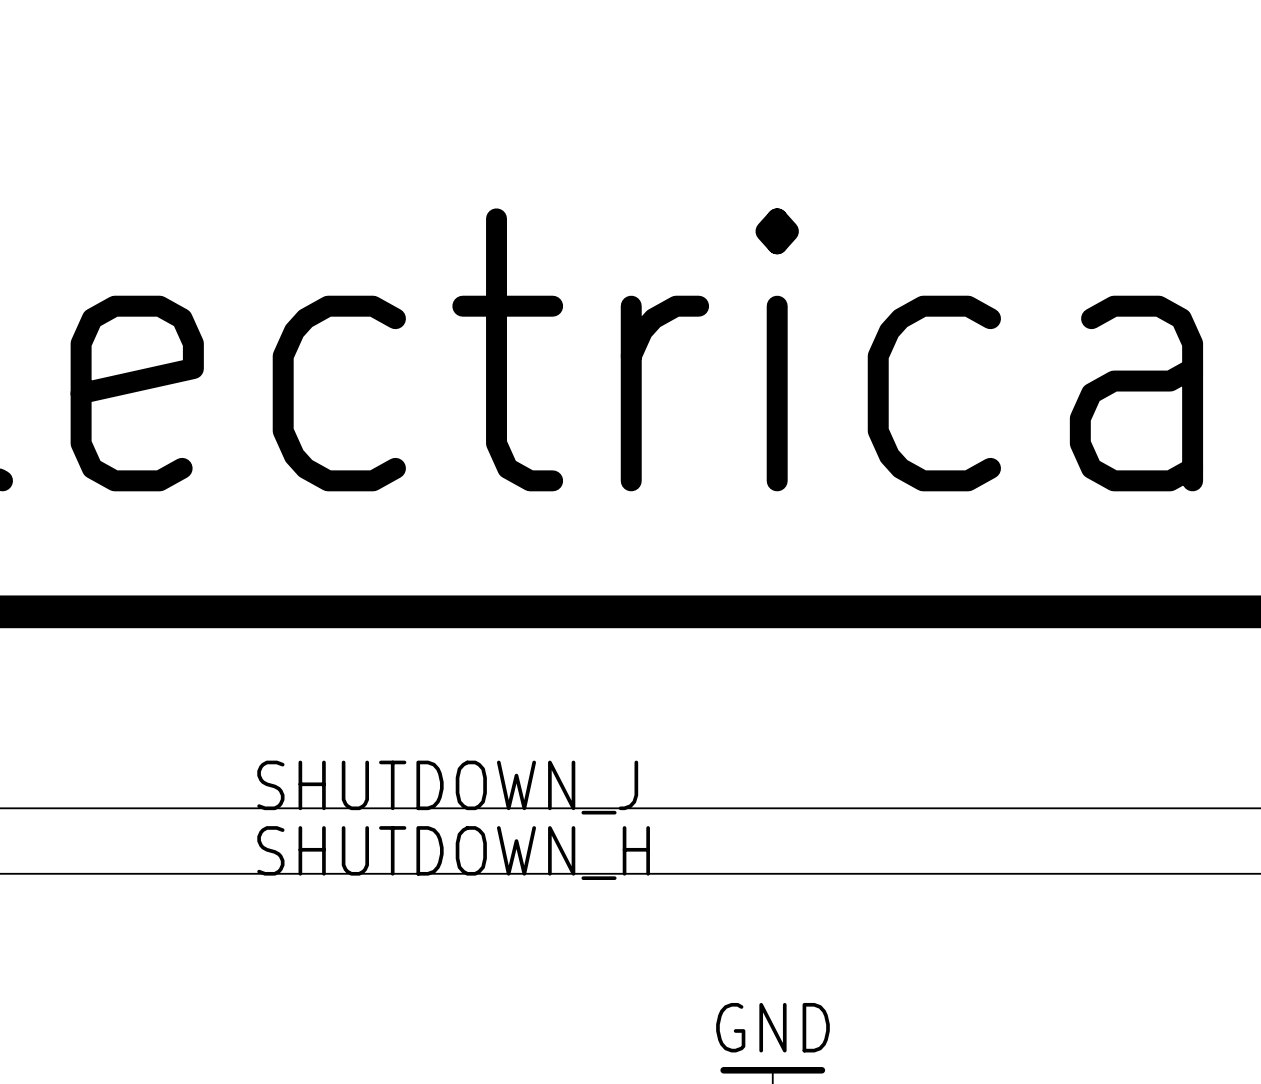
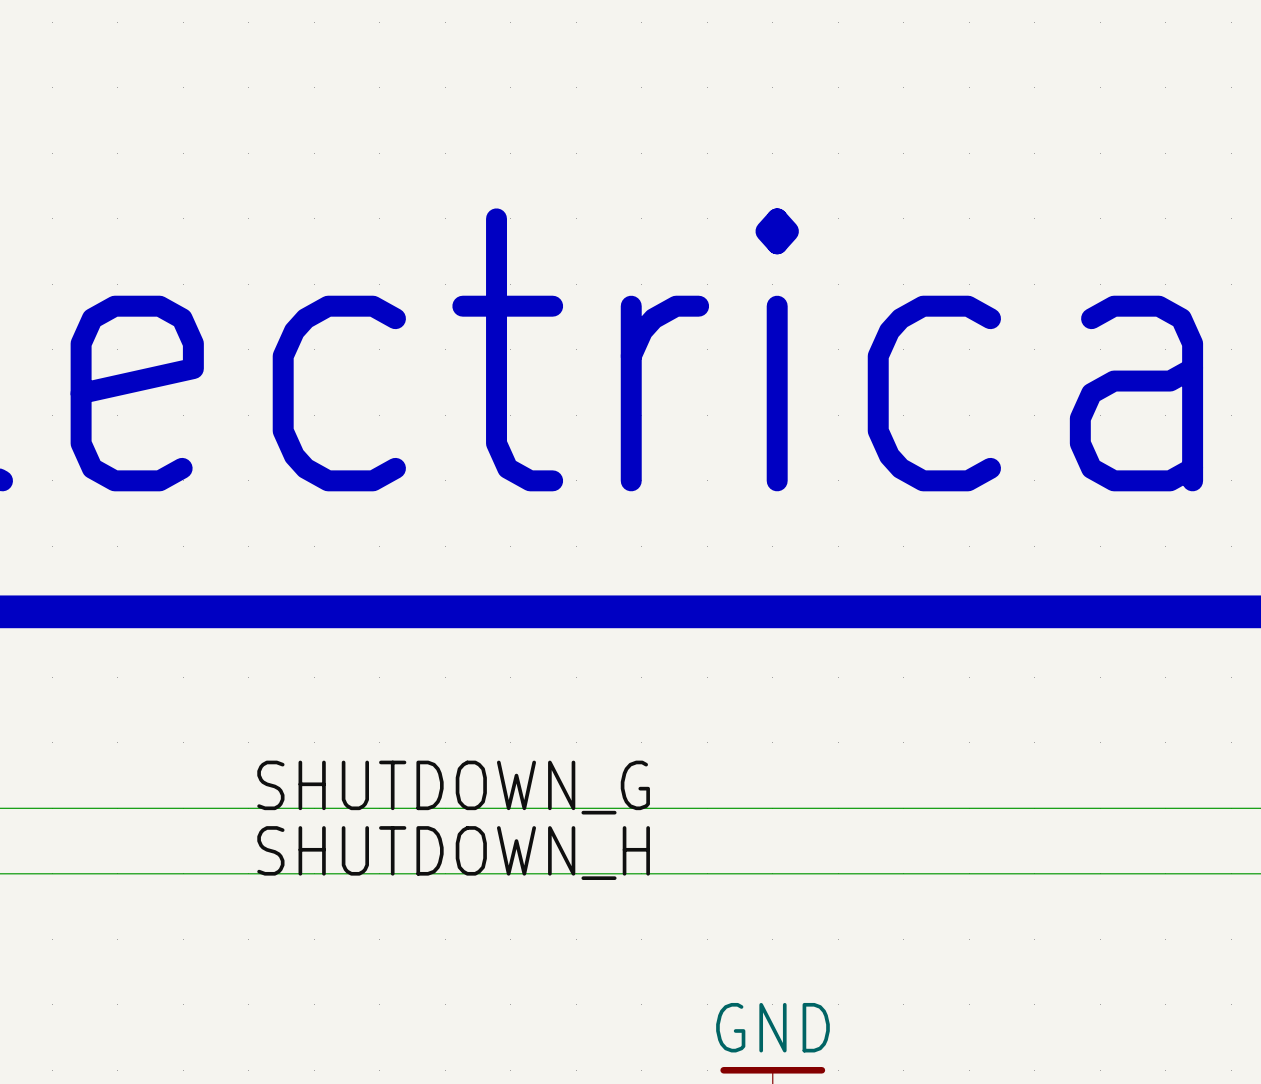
label: SHUTDOWN_J (447, 787) -> SHUTDOWN_G (453, 787)

